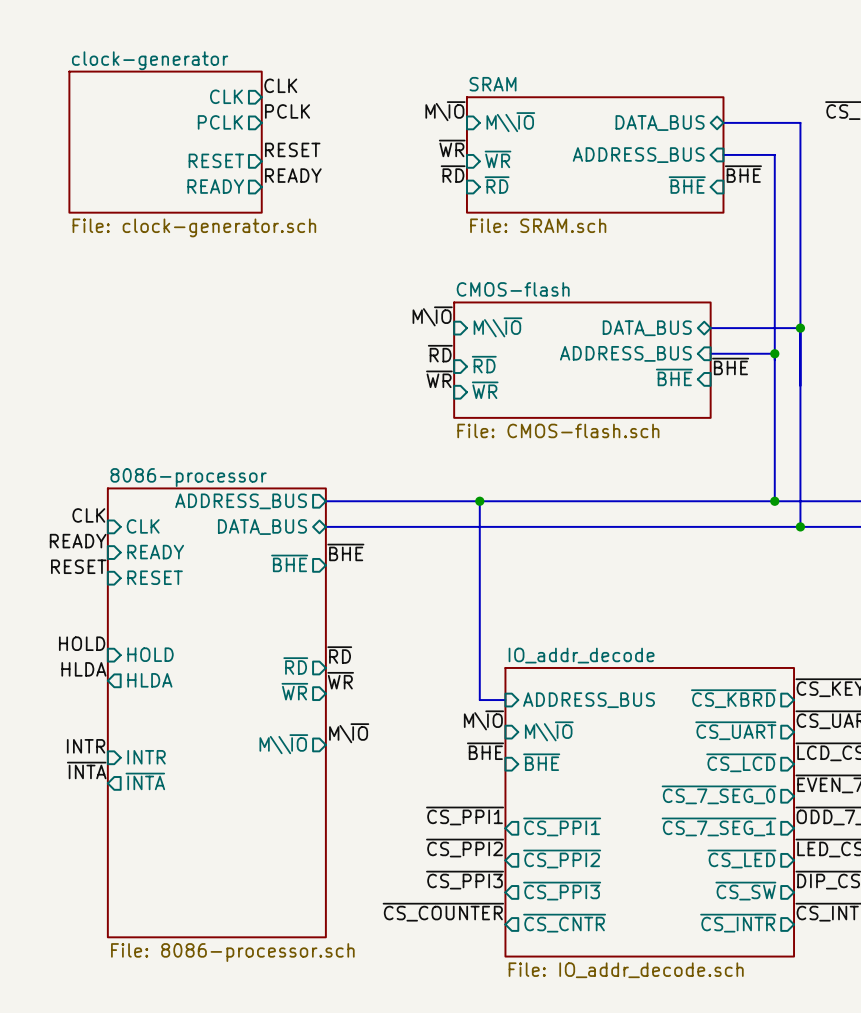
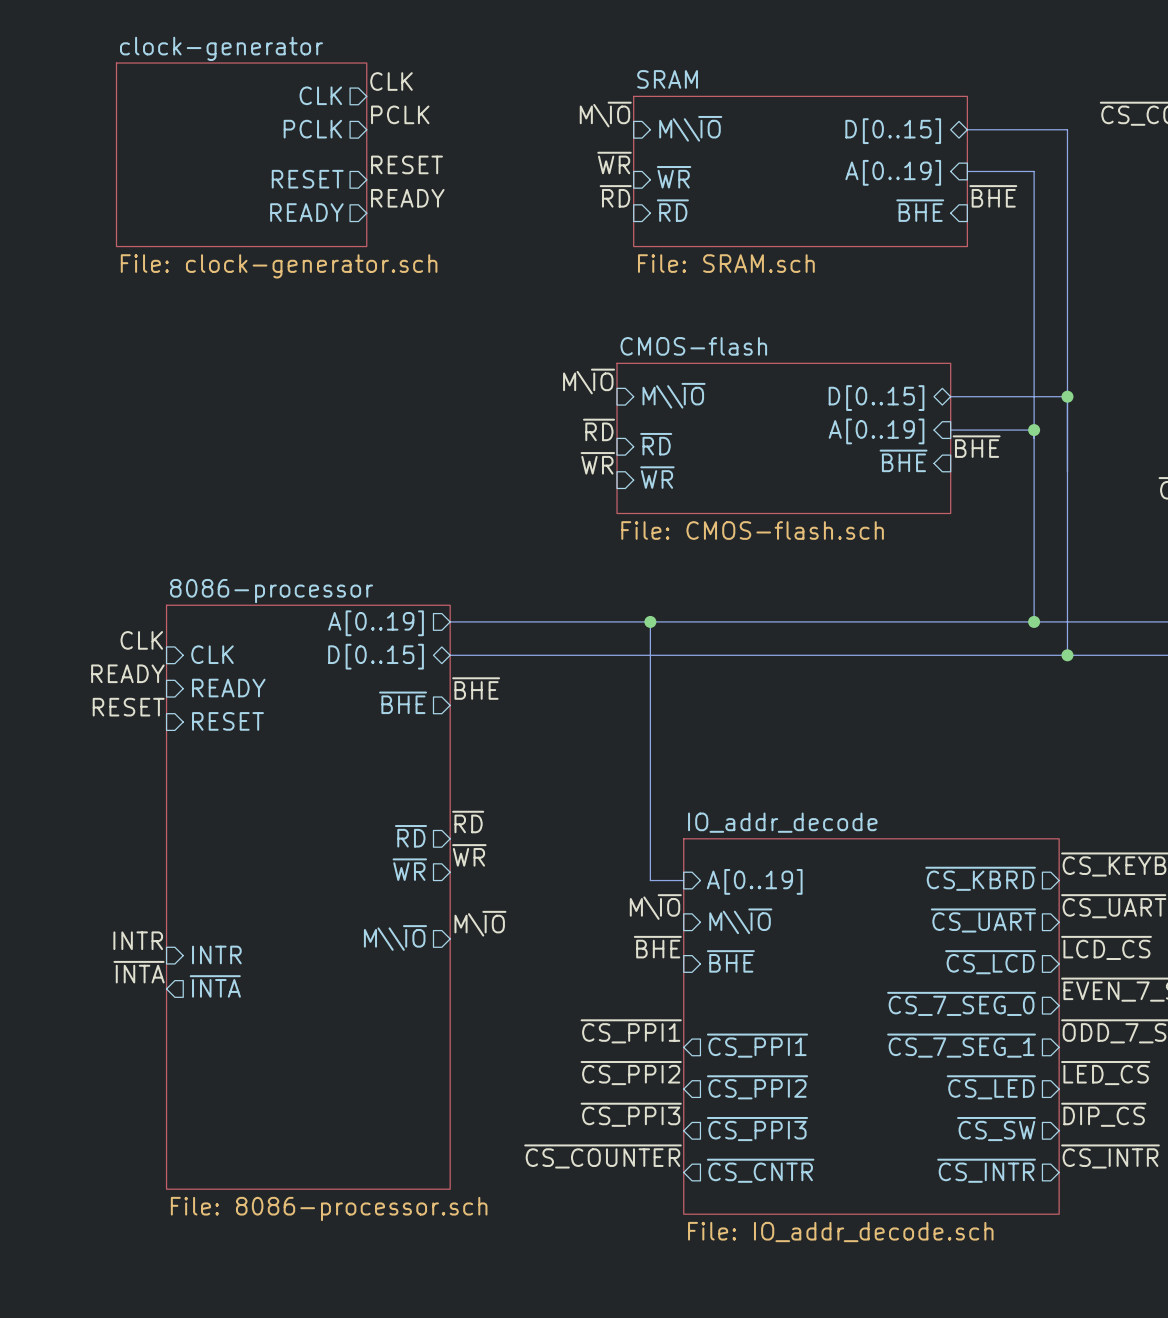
sheet pin: DATA_BUS (660, 123) -> D[0..15] (893, 131)
sheet pin: ADDRESS_BUS (638, 155) -> A[0..19] (893, 172)
sheet pin: DATA_BUS (647, 328) -> D[0..15] (876, 398)
sheet pin: ADDRESS_BUS (625, 353) -> A[0..19] (876, 431)
sheet pin: ADDRESS_BUS (241, 501) -> A[0..19] (376, 623)
sheet pin: DATA_BUS (262, 527) -> D[0..15] (376, 656)
label: HOLD (82, 643) -> none
sheet pin: HOLD (150, 654) -> none
label: HLDA (83, 669) -> none
sheet pin: HLDA (149, 680) -> none
sheet pin: ADDRESS_BUS (589, 700) -> A[0..19] (754, 881)

